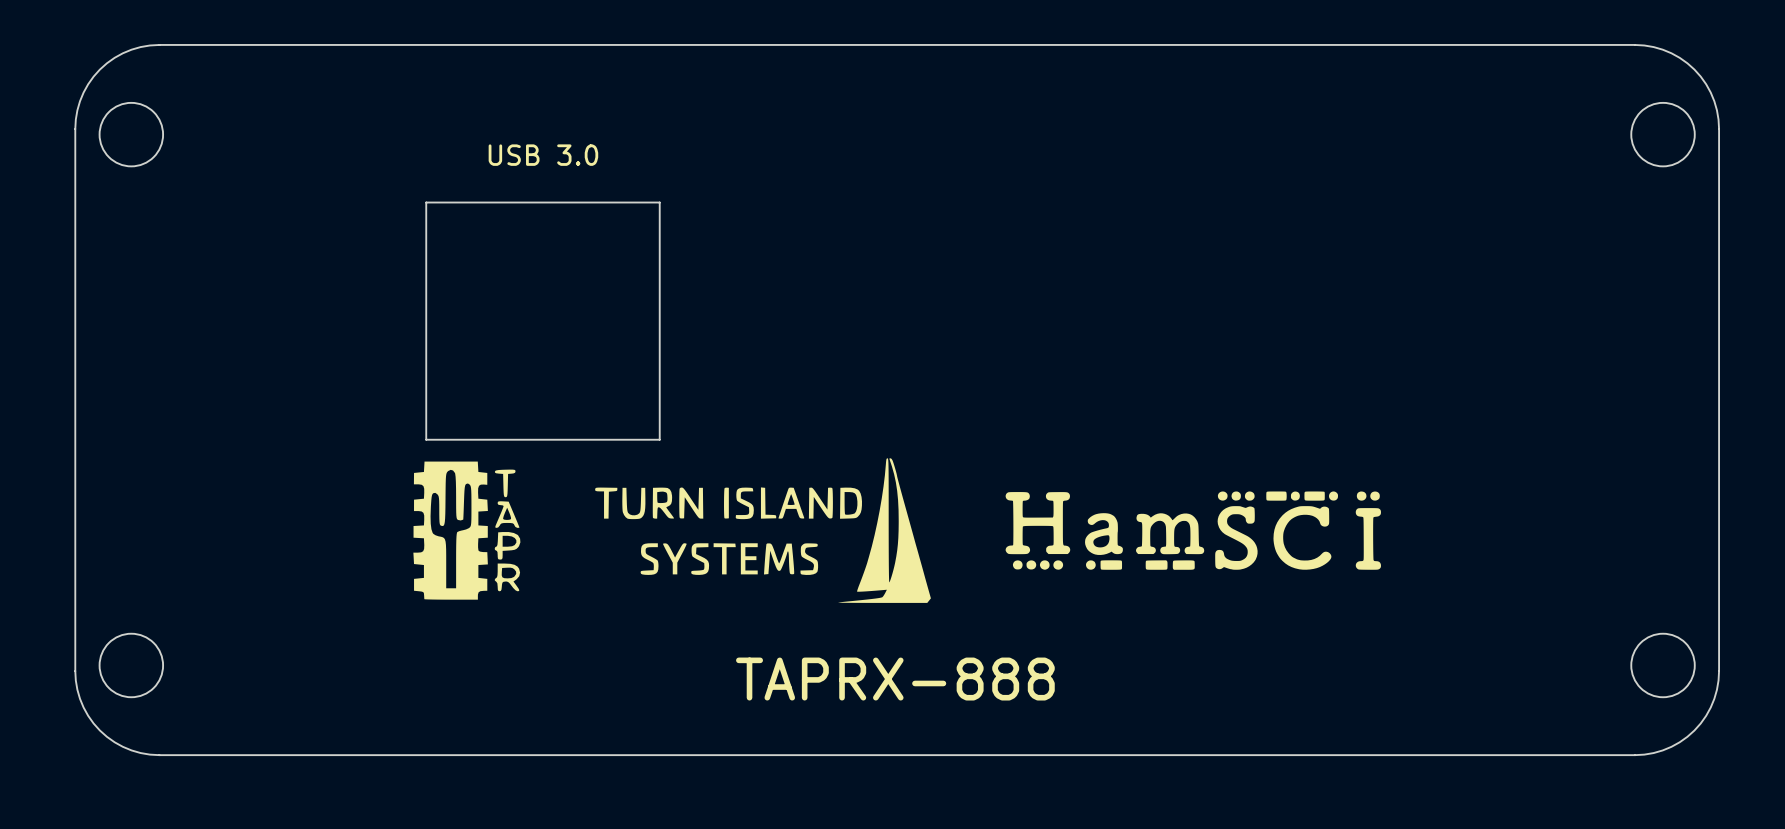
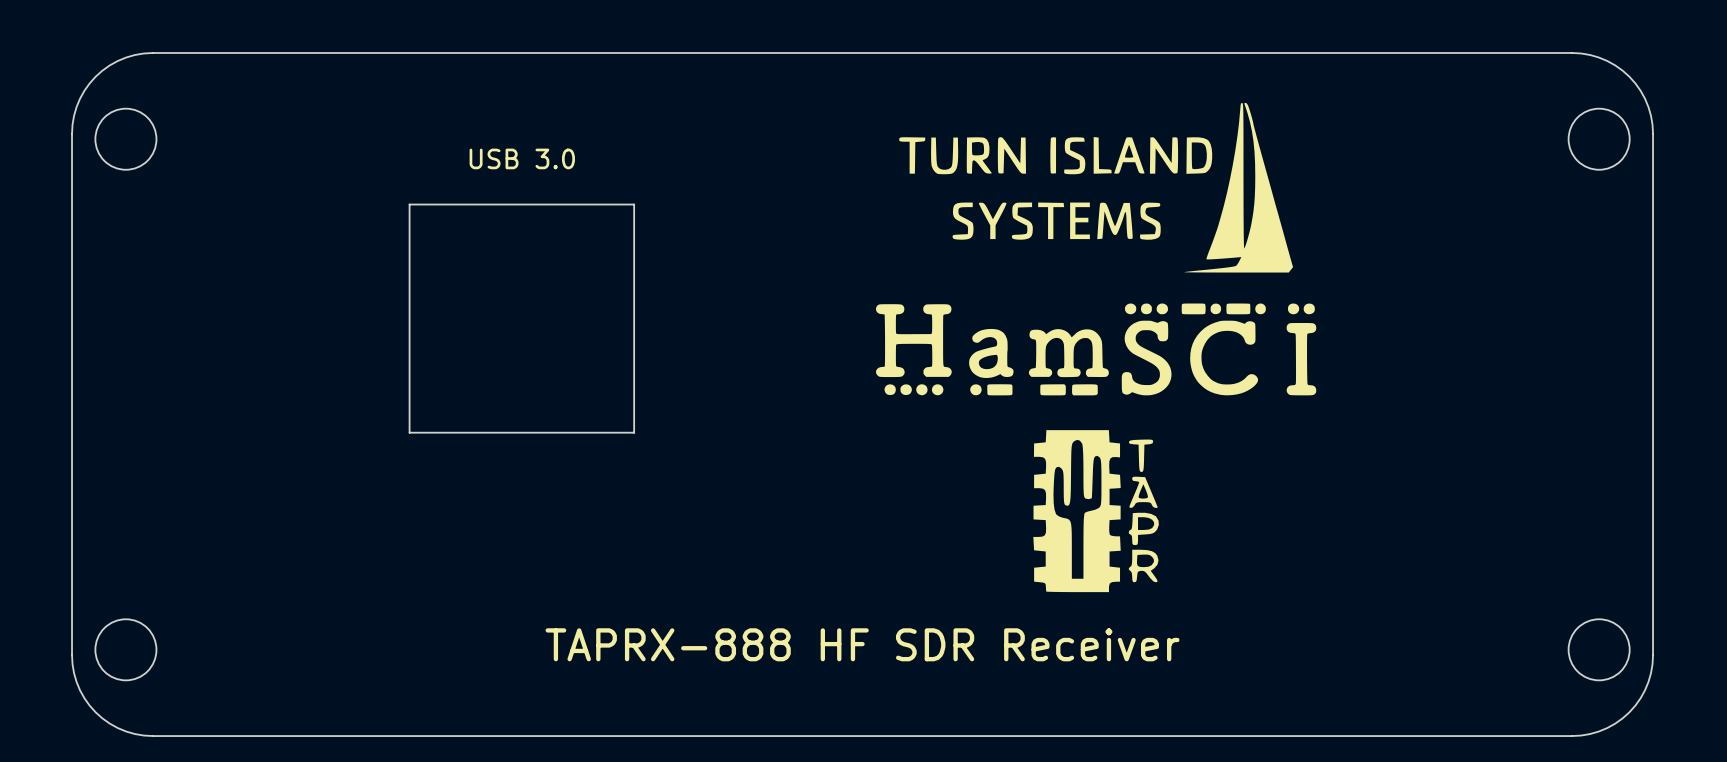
drawing: none -> [1050, 102, 1294, 273]
drawing: none -> [899, 137, 1027, 175]
drawing: none -> [952, 202, 1161, 240]
drawing: none -> [875, 303, 1266, 396]
drawing: none -> [1286, 303, 1317, 396]
drawing: none -> [1033, 430, 1159, 593]
drawing: [595, 458, 931, 603] -> none
drawing: [413, 461, 521, 600] -> none
drawing: [1005, 491, 1381, 570] -> none
drawing shape: [1172, 560, 1195, 570] -> [1128, 549, 1159, 583]
text: none -> TAPRX-888 HF SDR Receiver (862, 644)
text: TAPRX-888 (895, 679) -> none

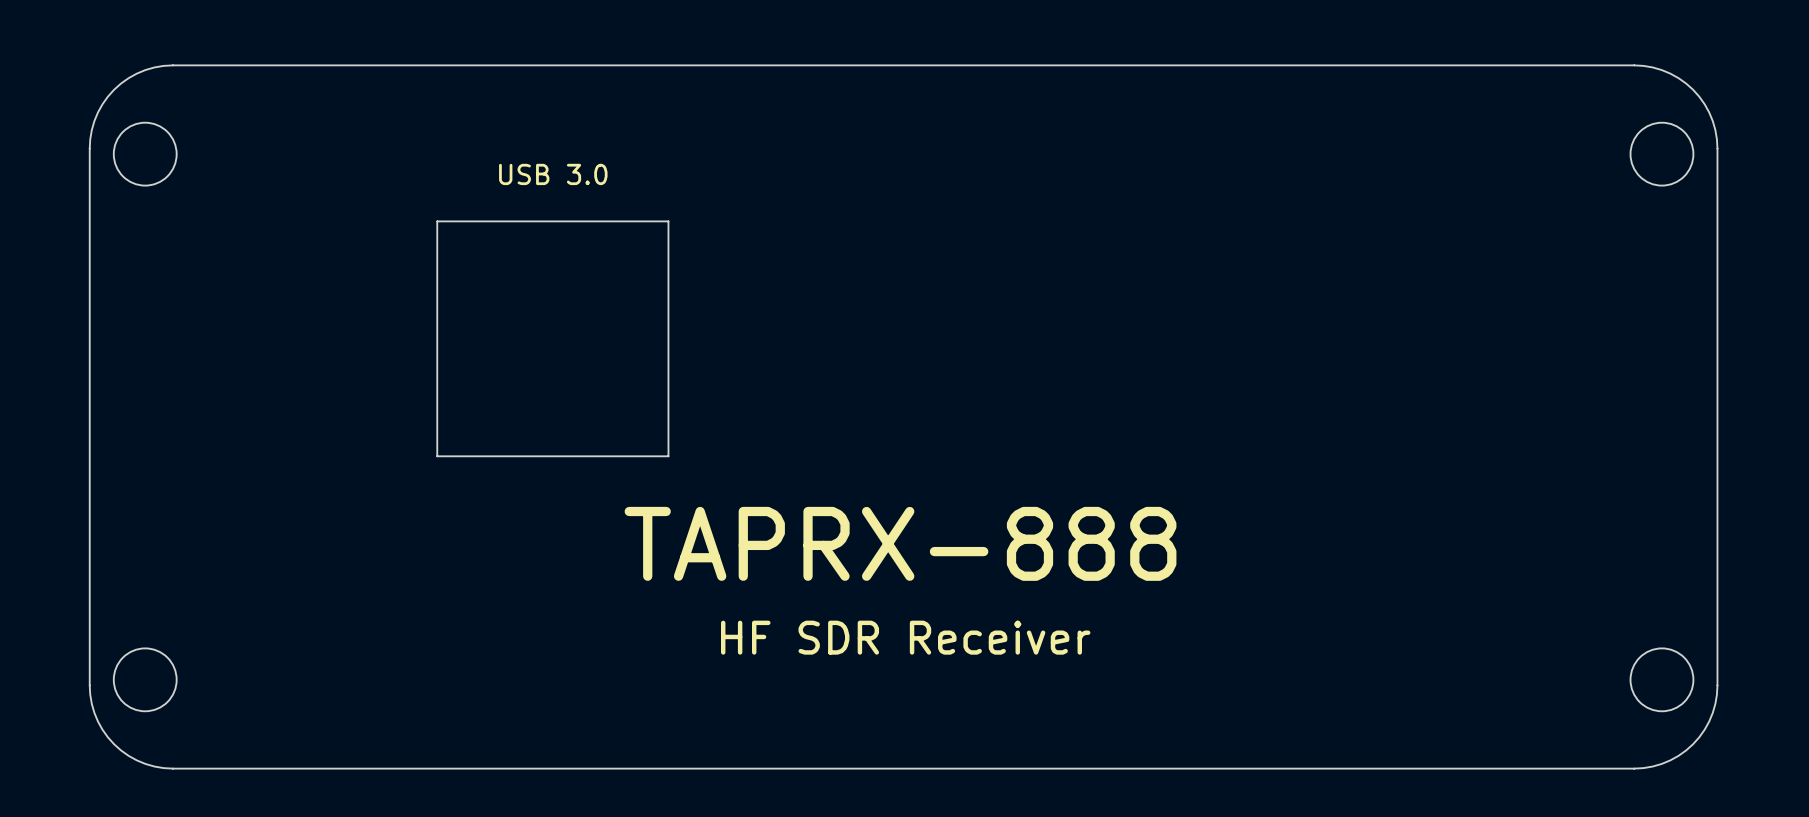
drawing: [1050, 102, 1294, 273] -> none
drawing: [899, 137, 1027, 175] -> none
drawing: [952, 202, 1161, 240] -> none
drawing: [875, 303, 1266, 396] -> none
drawing: [1286, 303, 1317, 396] -> none
drawing: [1033, 430, 1159, 593] -> none
text: none -> TAPRX-888 (900, 543)
text: TAPRX-888 HF SDR Receiver (862, 644) -> HF SDR Receiver (905, 637)

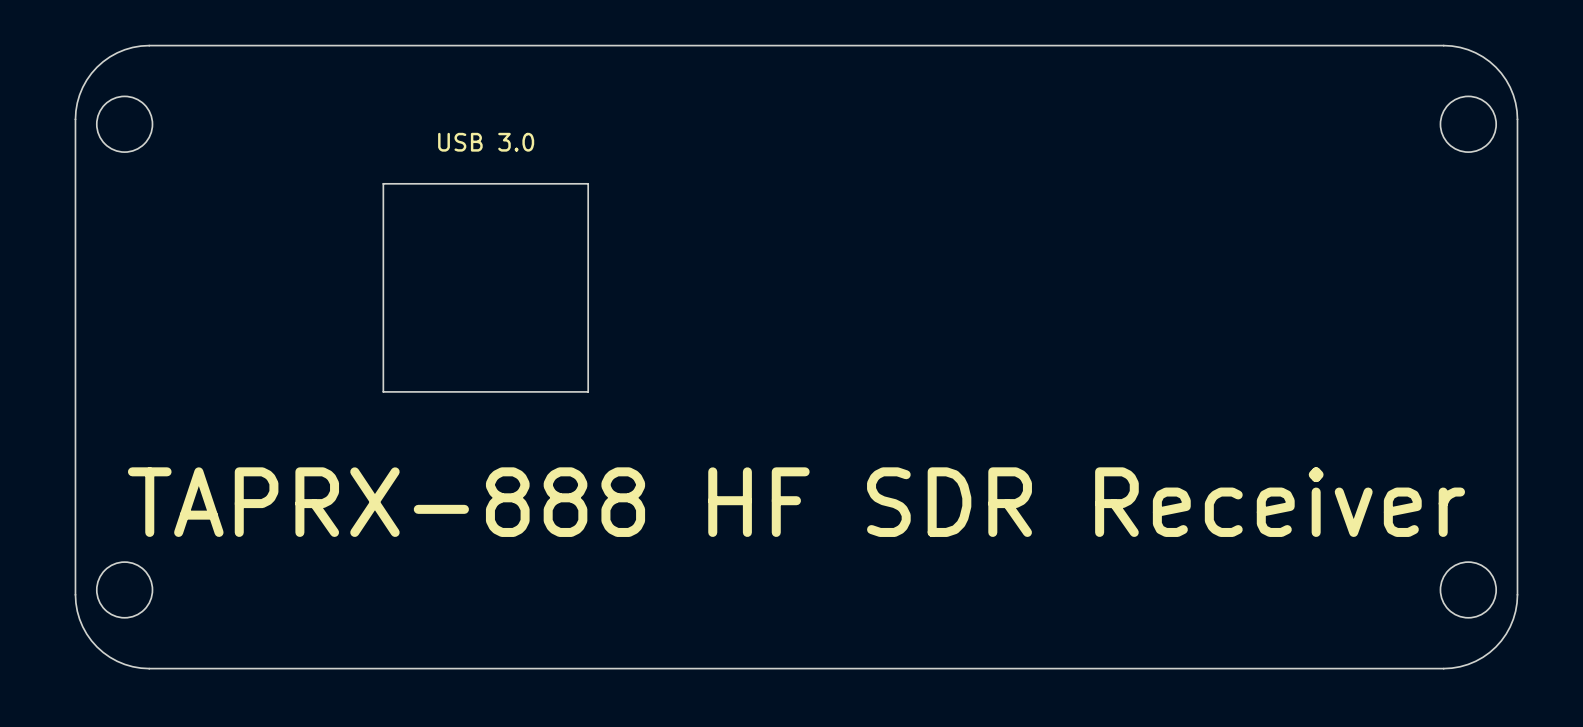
text: TAPRX-888 (900, 543) -> none
text: HF SDR Receiver (905, 637) -> TAPRX-888 HF SDR Receiver (796, 502)

